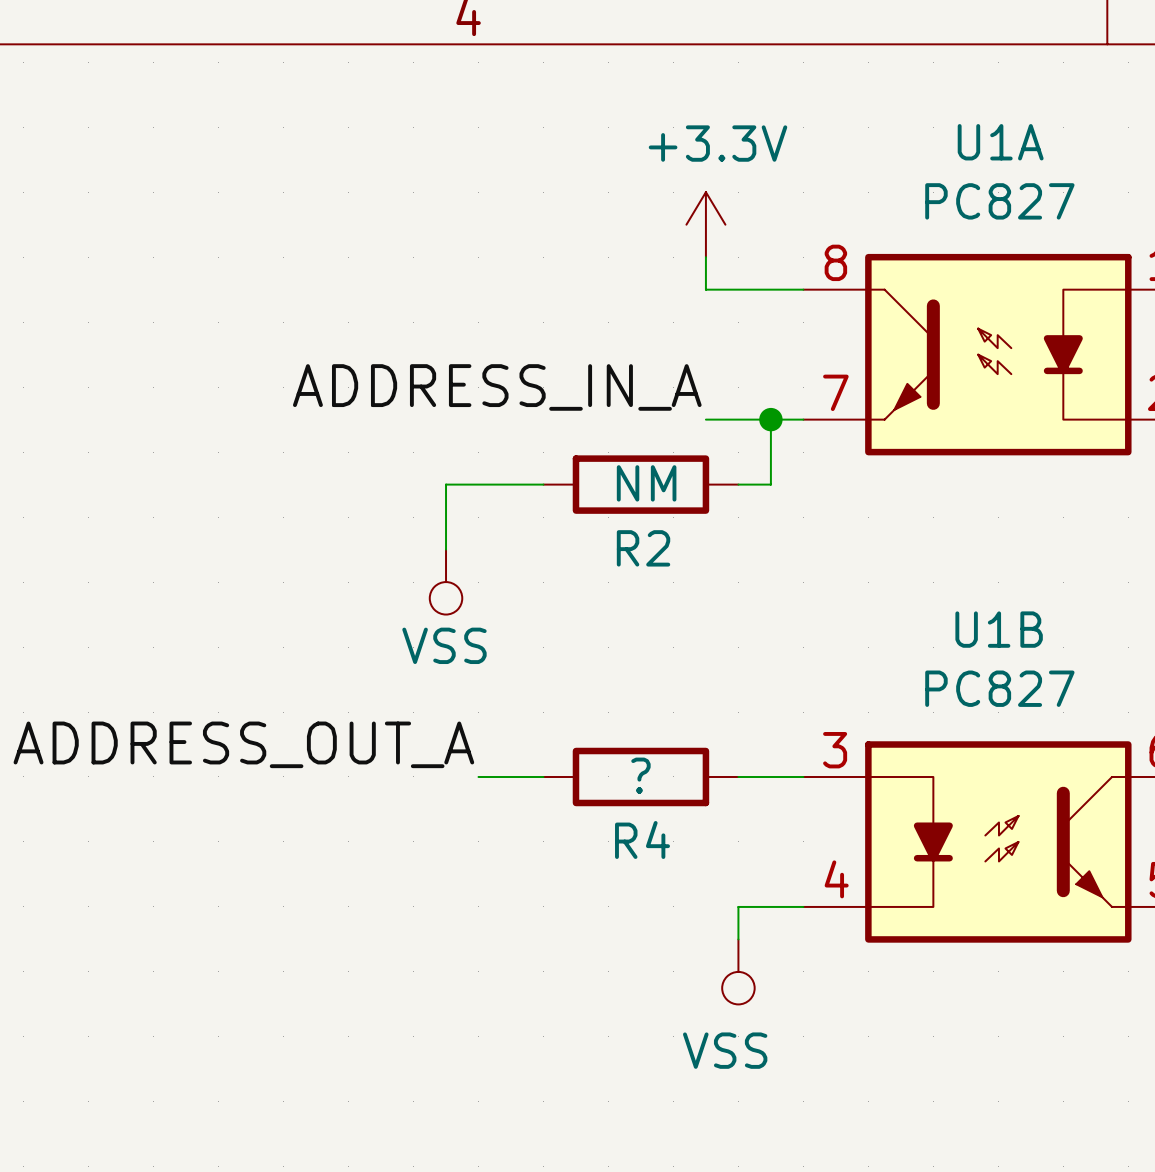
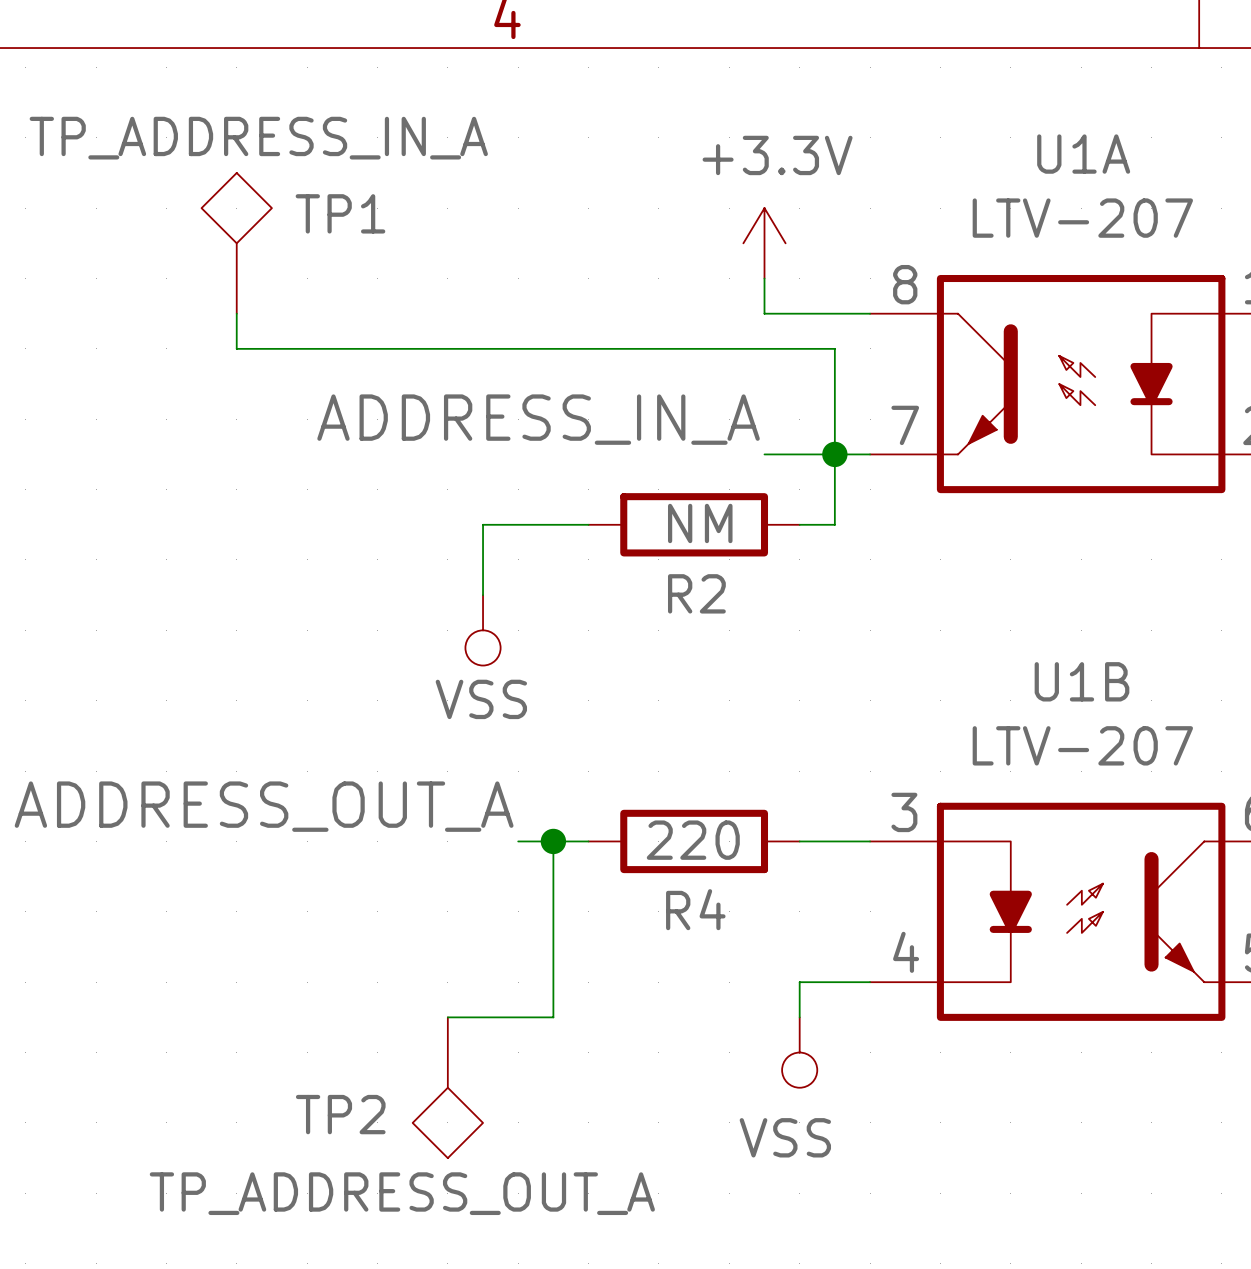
U1A value: PC827 (999, 201) -> LTV-207 (1082, 218)
TP1: none -> TP_ADDRESS_IN_A (236, 243)
wire: none -> (236, 313) (236, 348) (834, 348) (834, 454)
U1B value: PC827 (999, 688) -> LTV-207 (1082, 745)
R4 value: ? (640, 775) -> 220 (693, 840)
wire: none -> (553, 841) (553, 1017) (447, 1017)
junction: none -> (553, 841)
TP2: none -> TP_ADDRESS_OUT_A (447, 1087)

